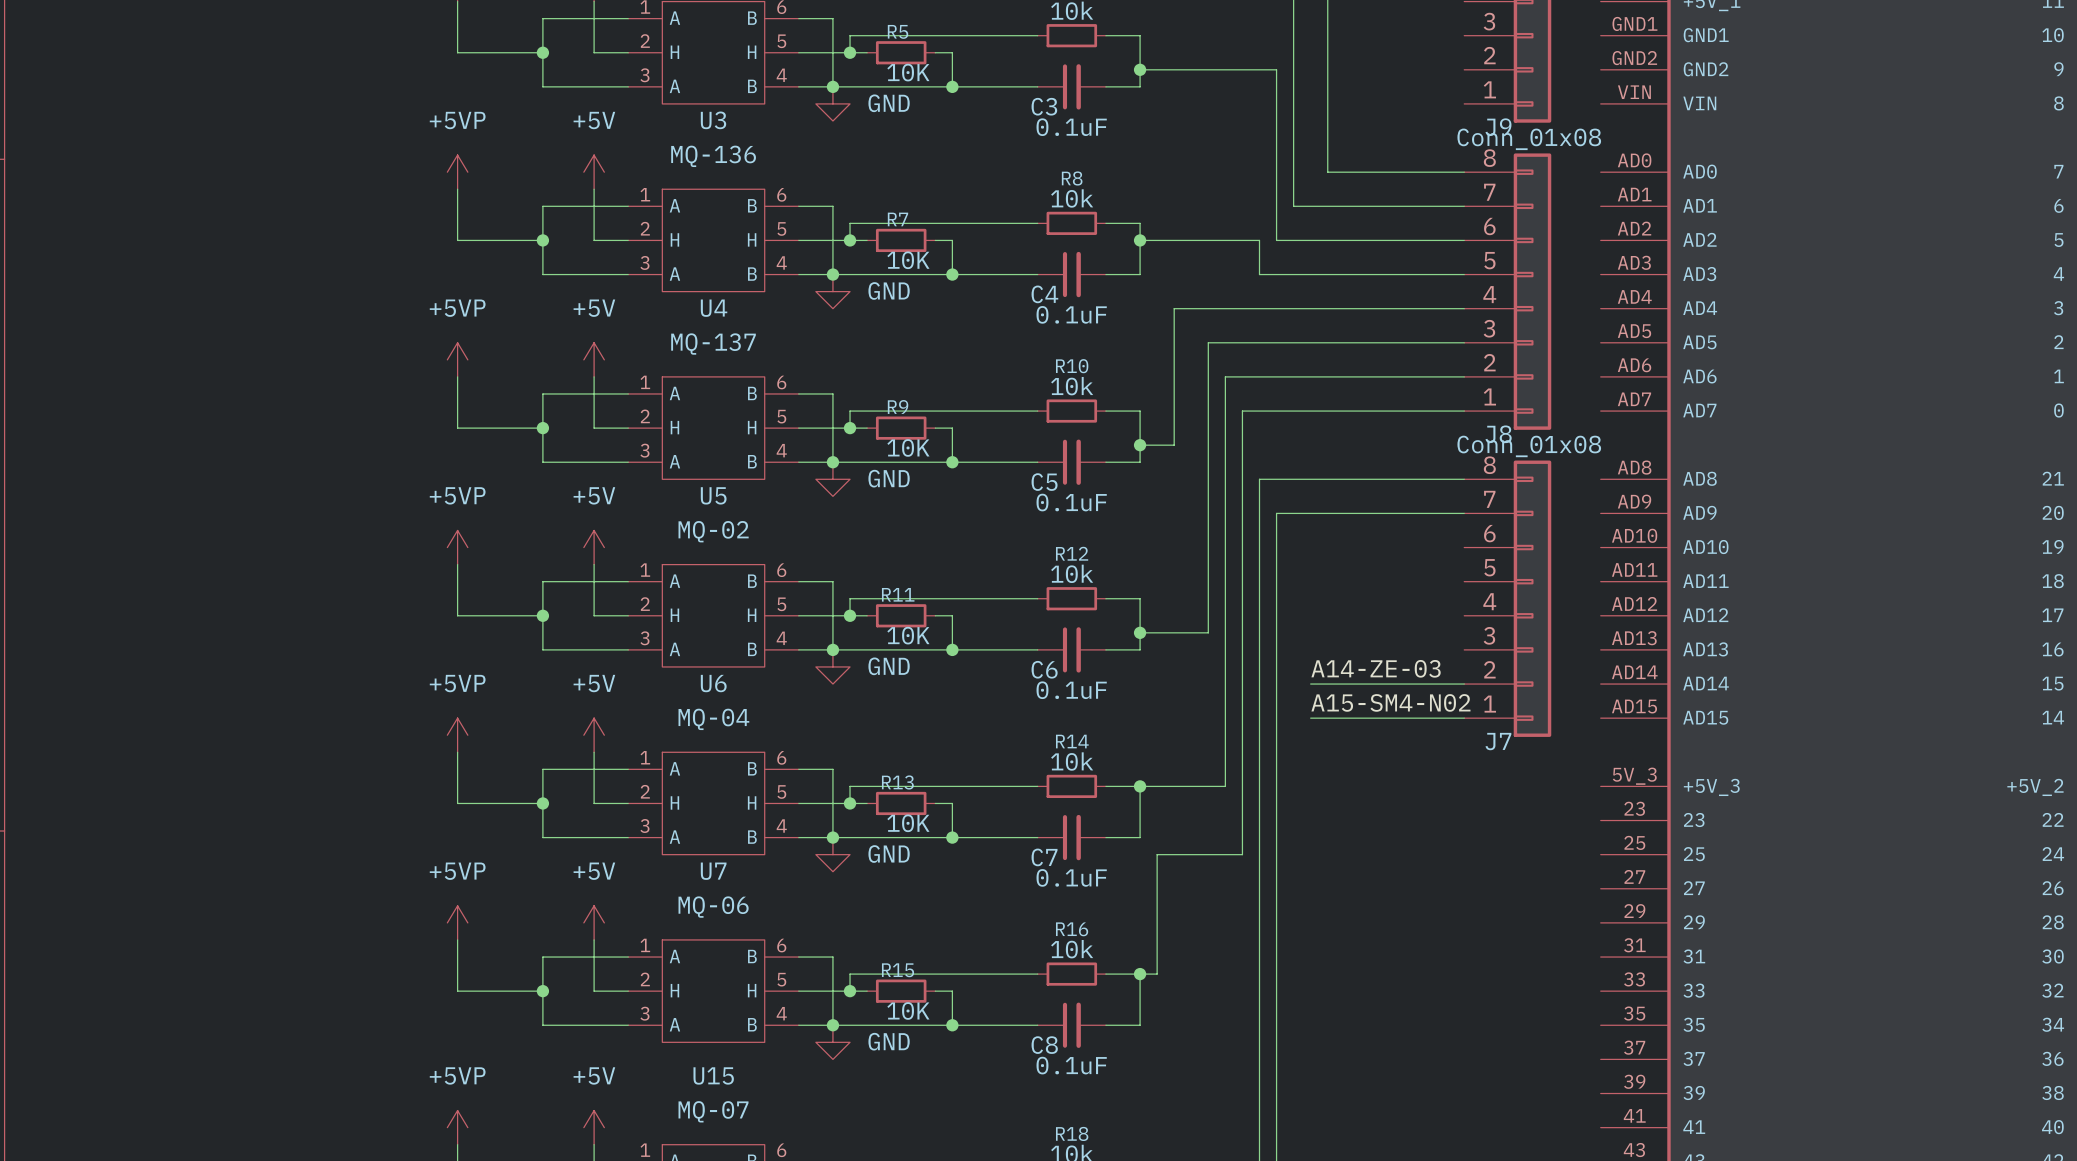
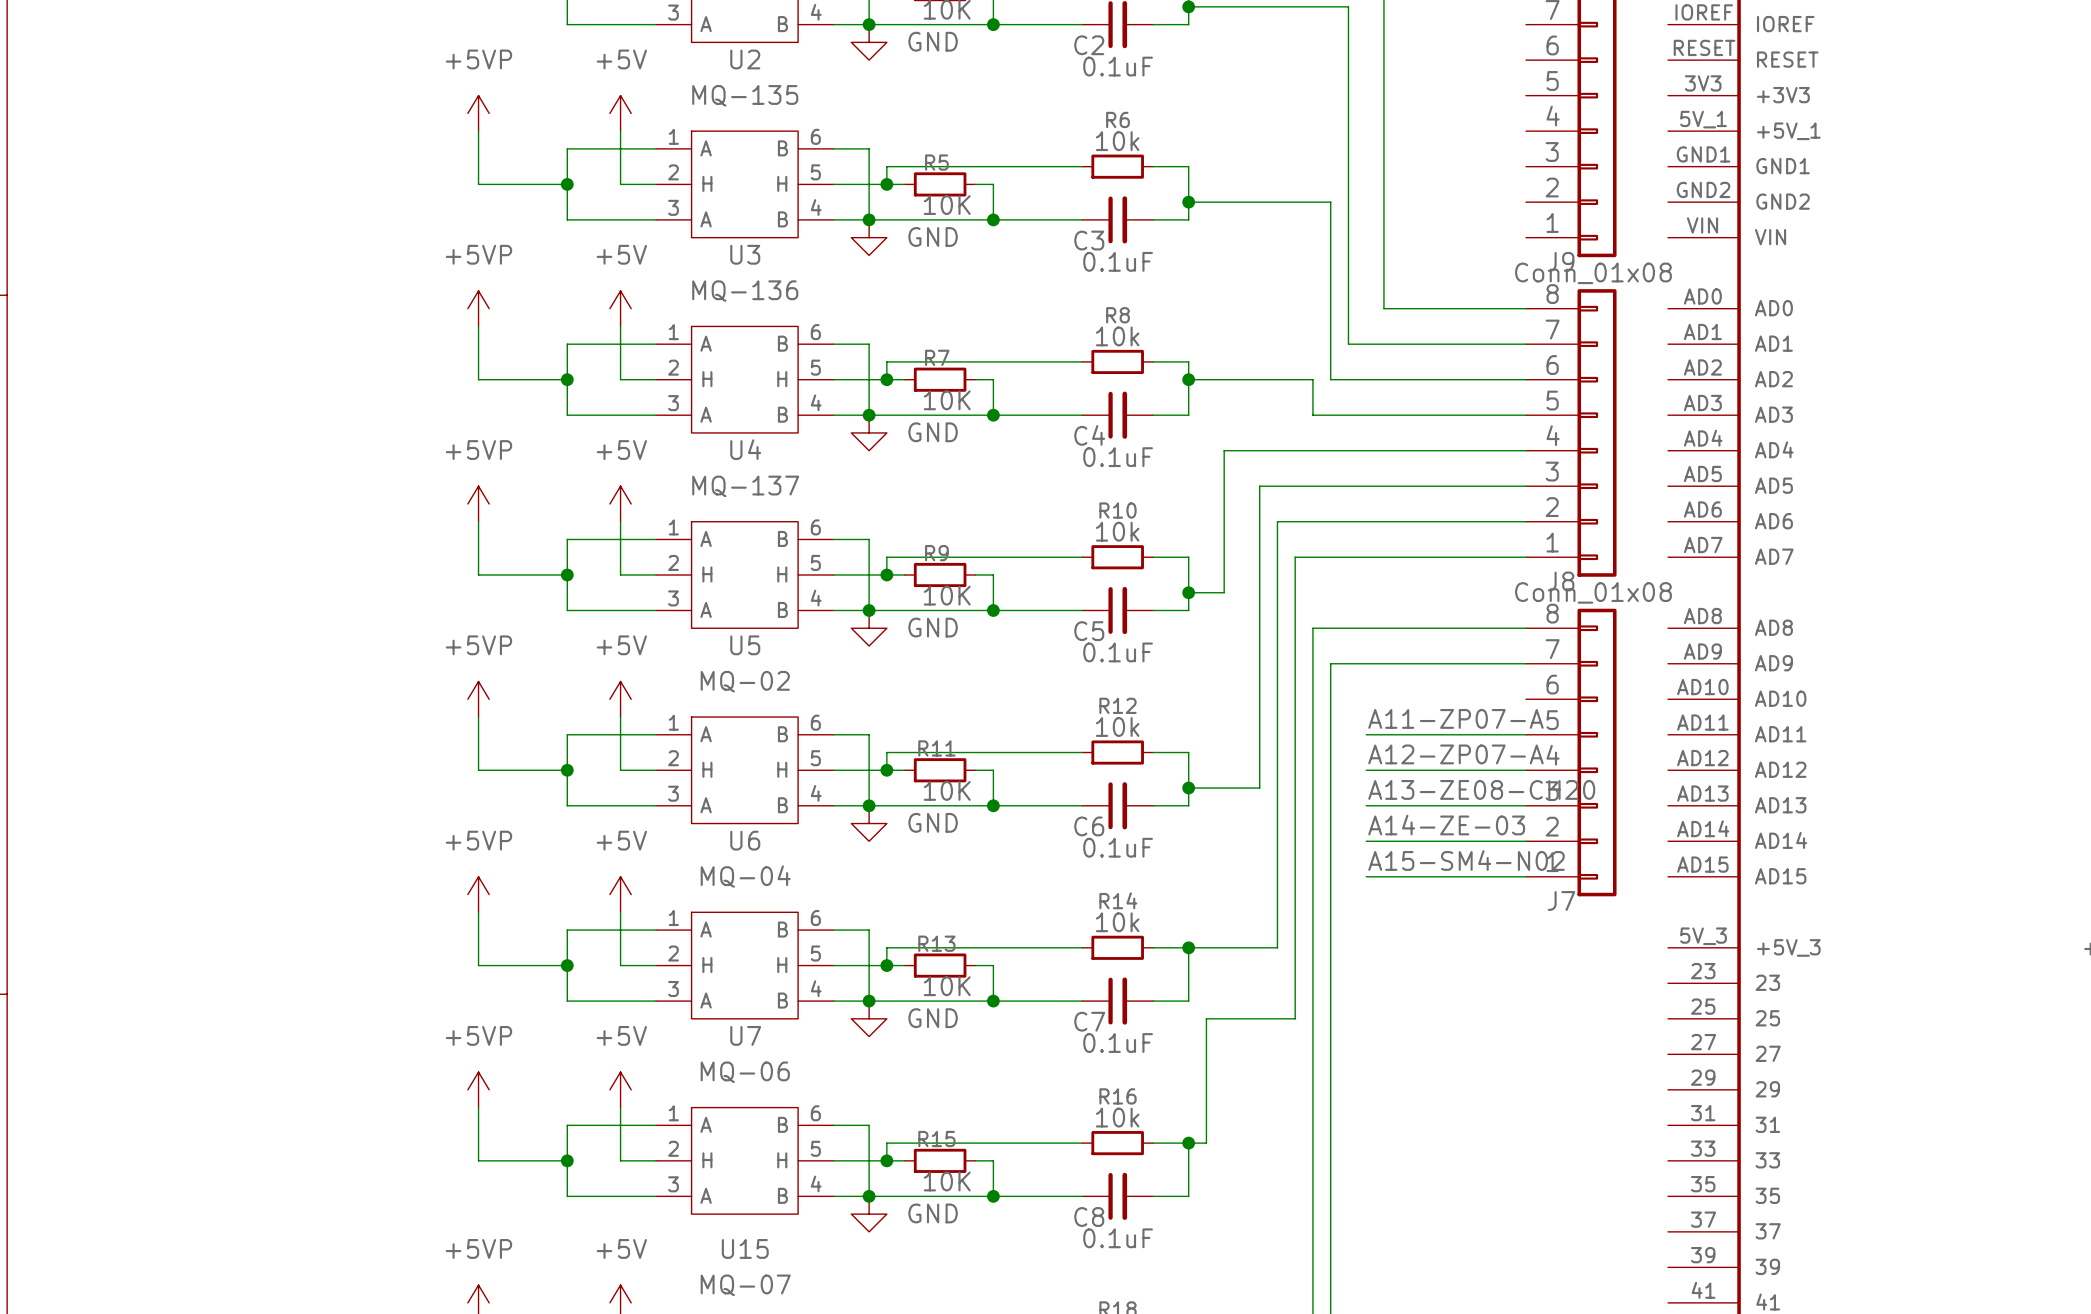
label: none -> A11-ZP07-A (1455, 718)
wire: none -> (1366, 734) (1526, 734)
label: none -> A12-ZP07-A (1455, 754)
wire: none -> (1366, 770) (1526, 770)
label: none -> A13-ZE08-CH20 (1481, 789)
wire: none -> (1366, 805) (1526, 805)

